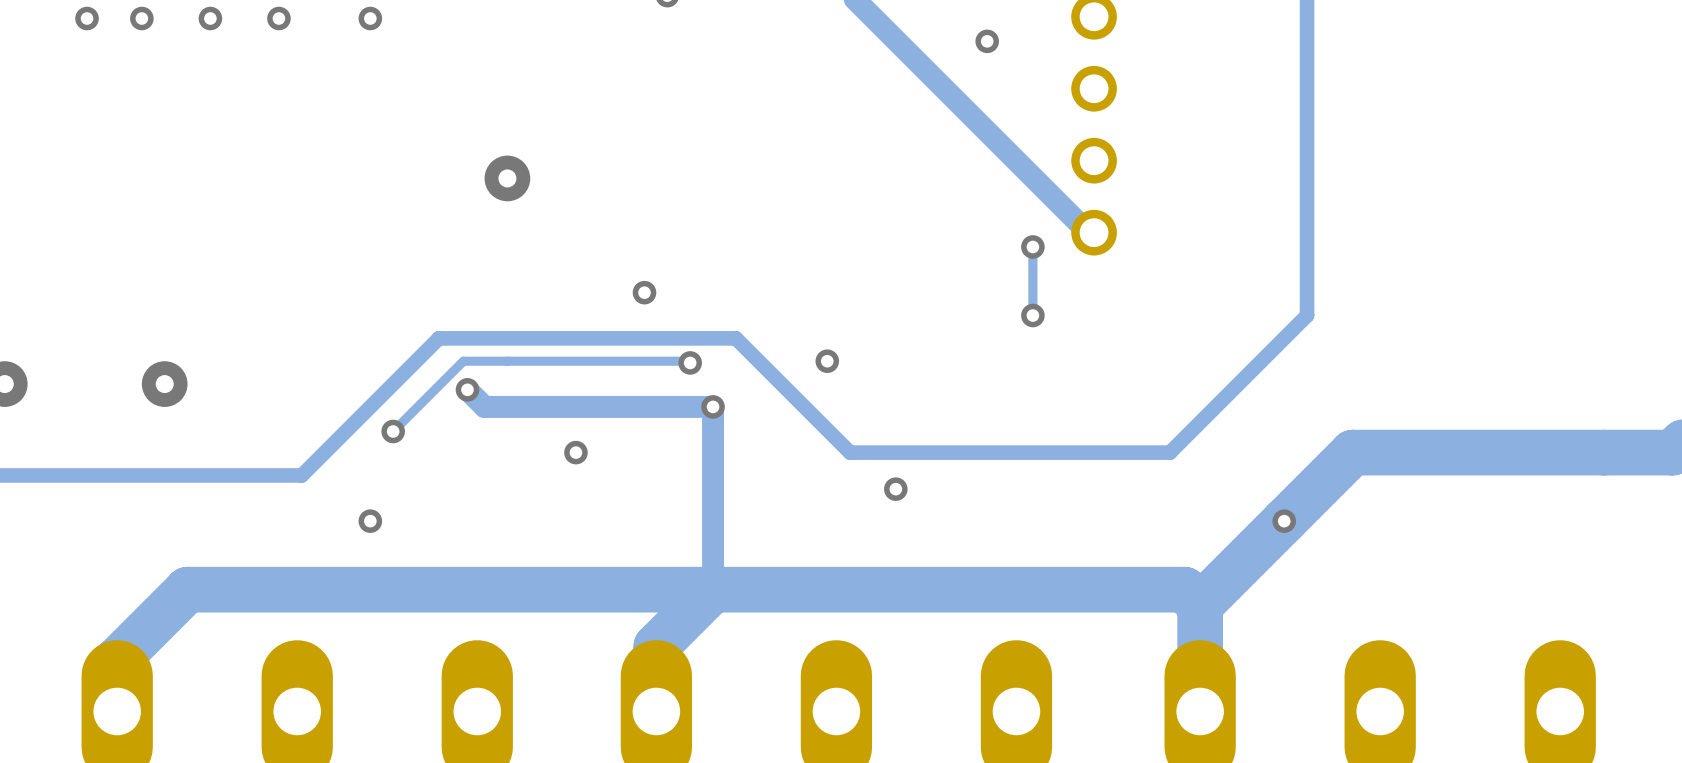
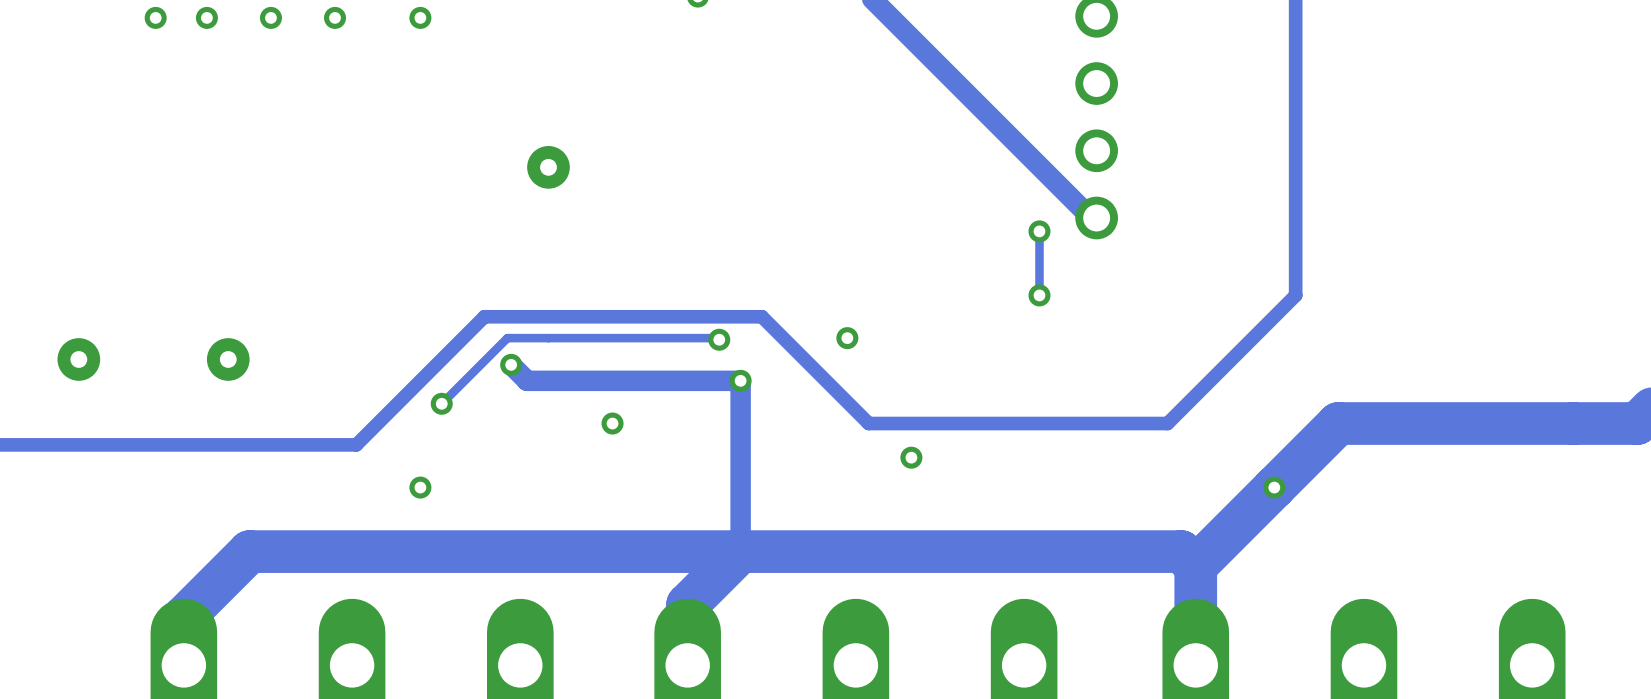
via: (987, 41) -> none
via: (644, 292) -> none

